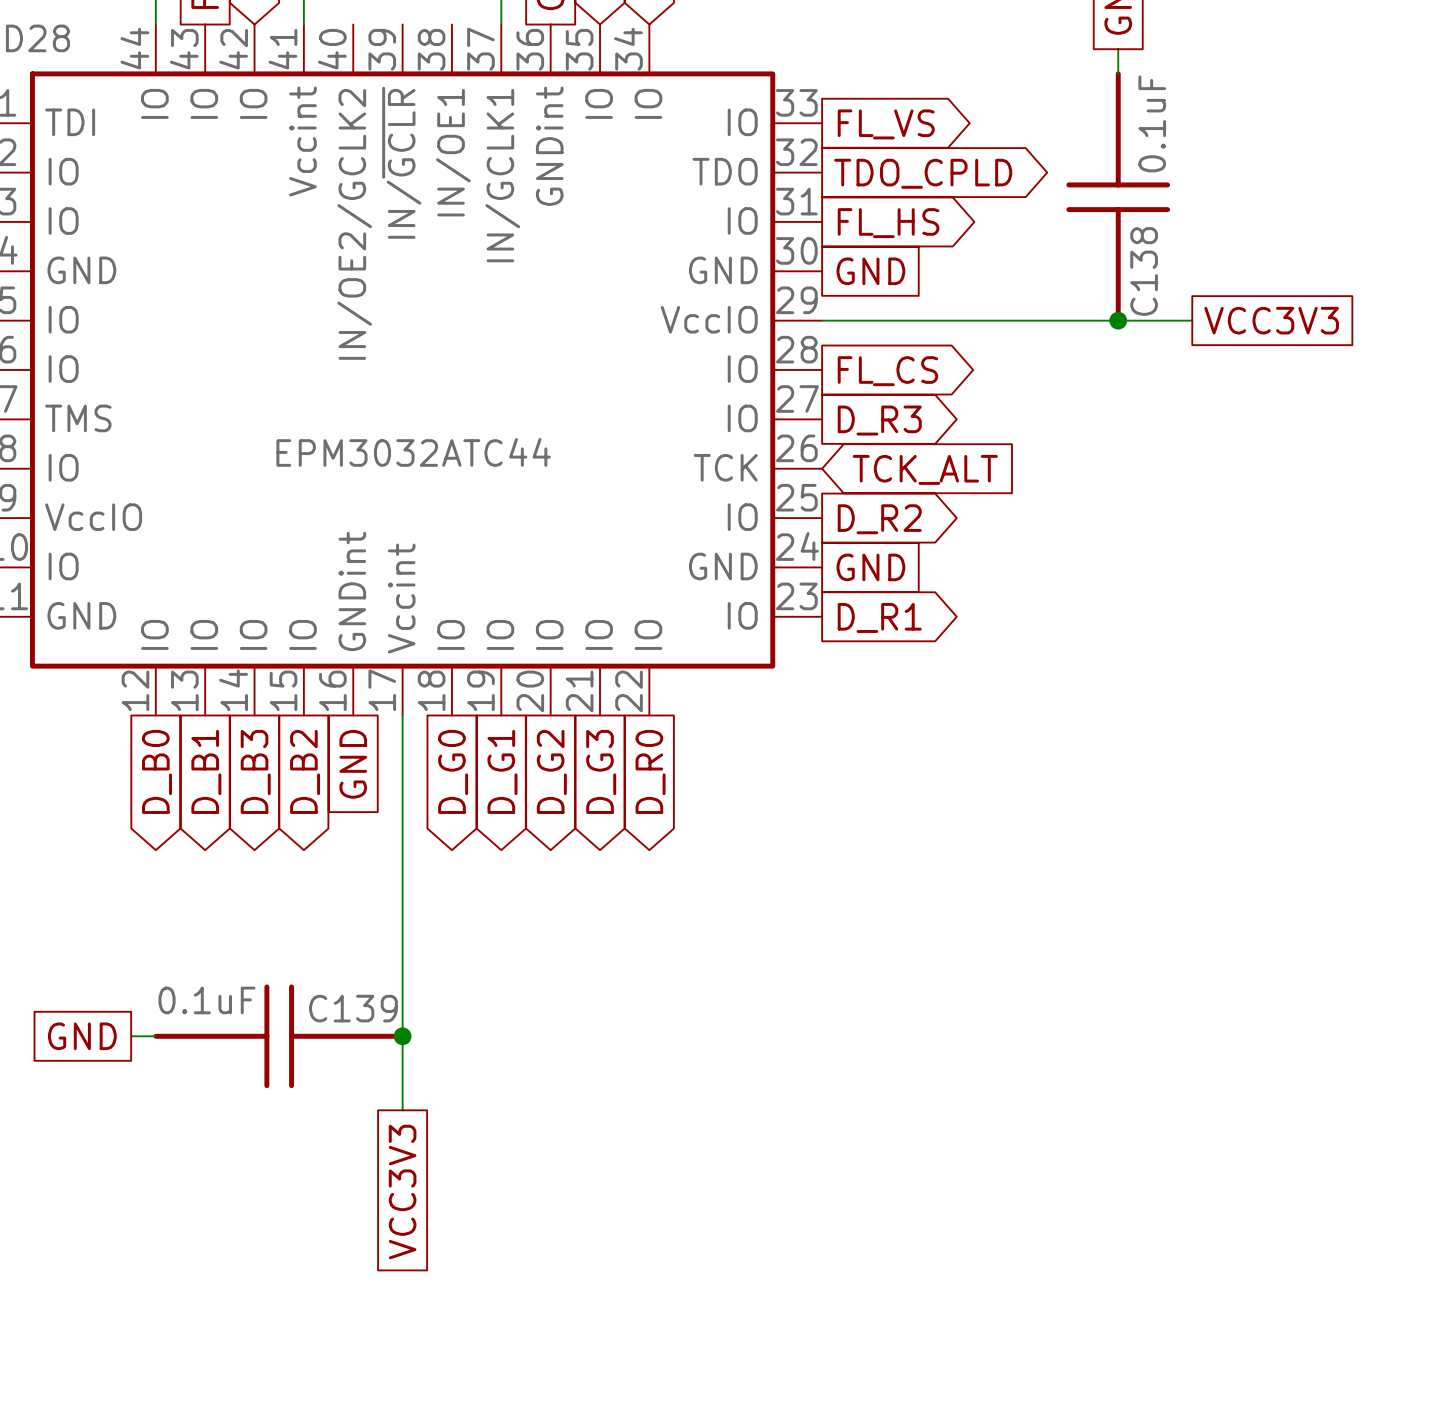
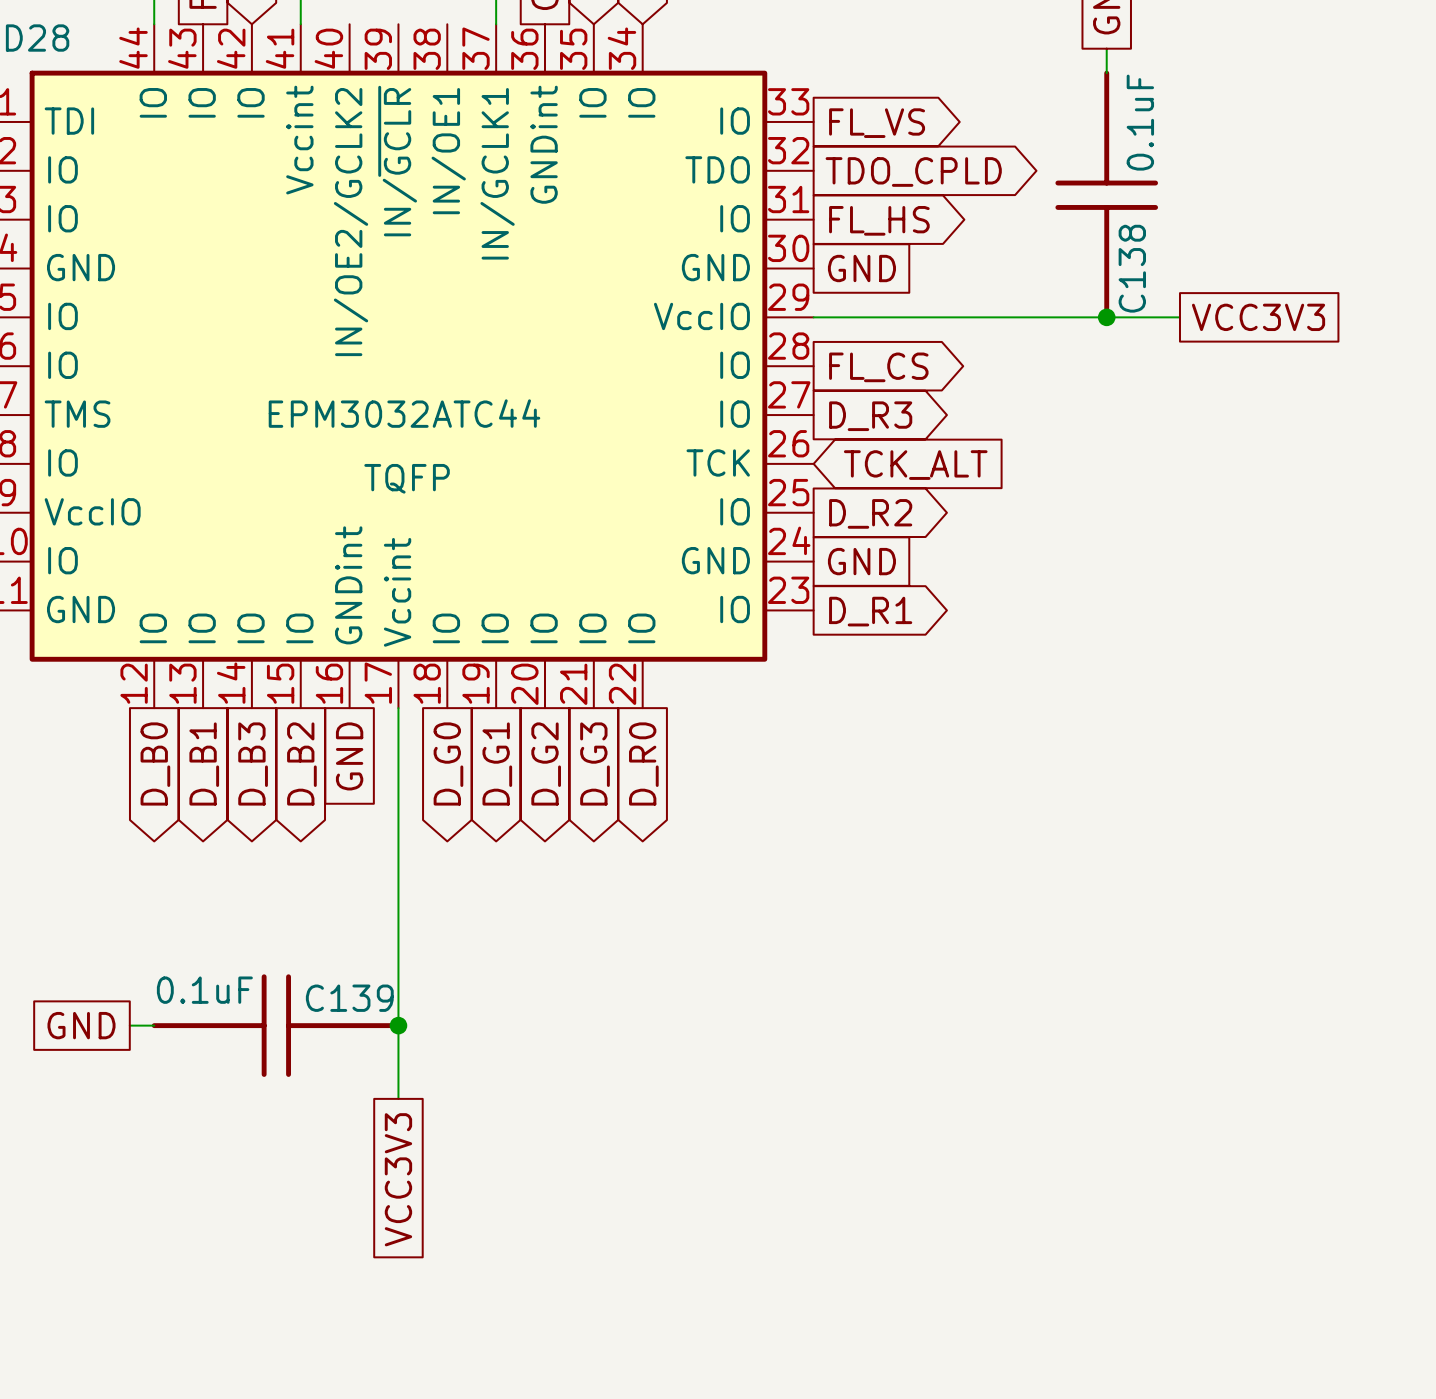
D28 value position: EPM3032ATC44 (413, 452) -> EPM3032ATC44 (404, 413)
D28 text: none -> TQFP (407, 478)

